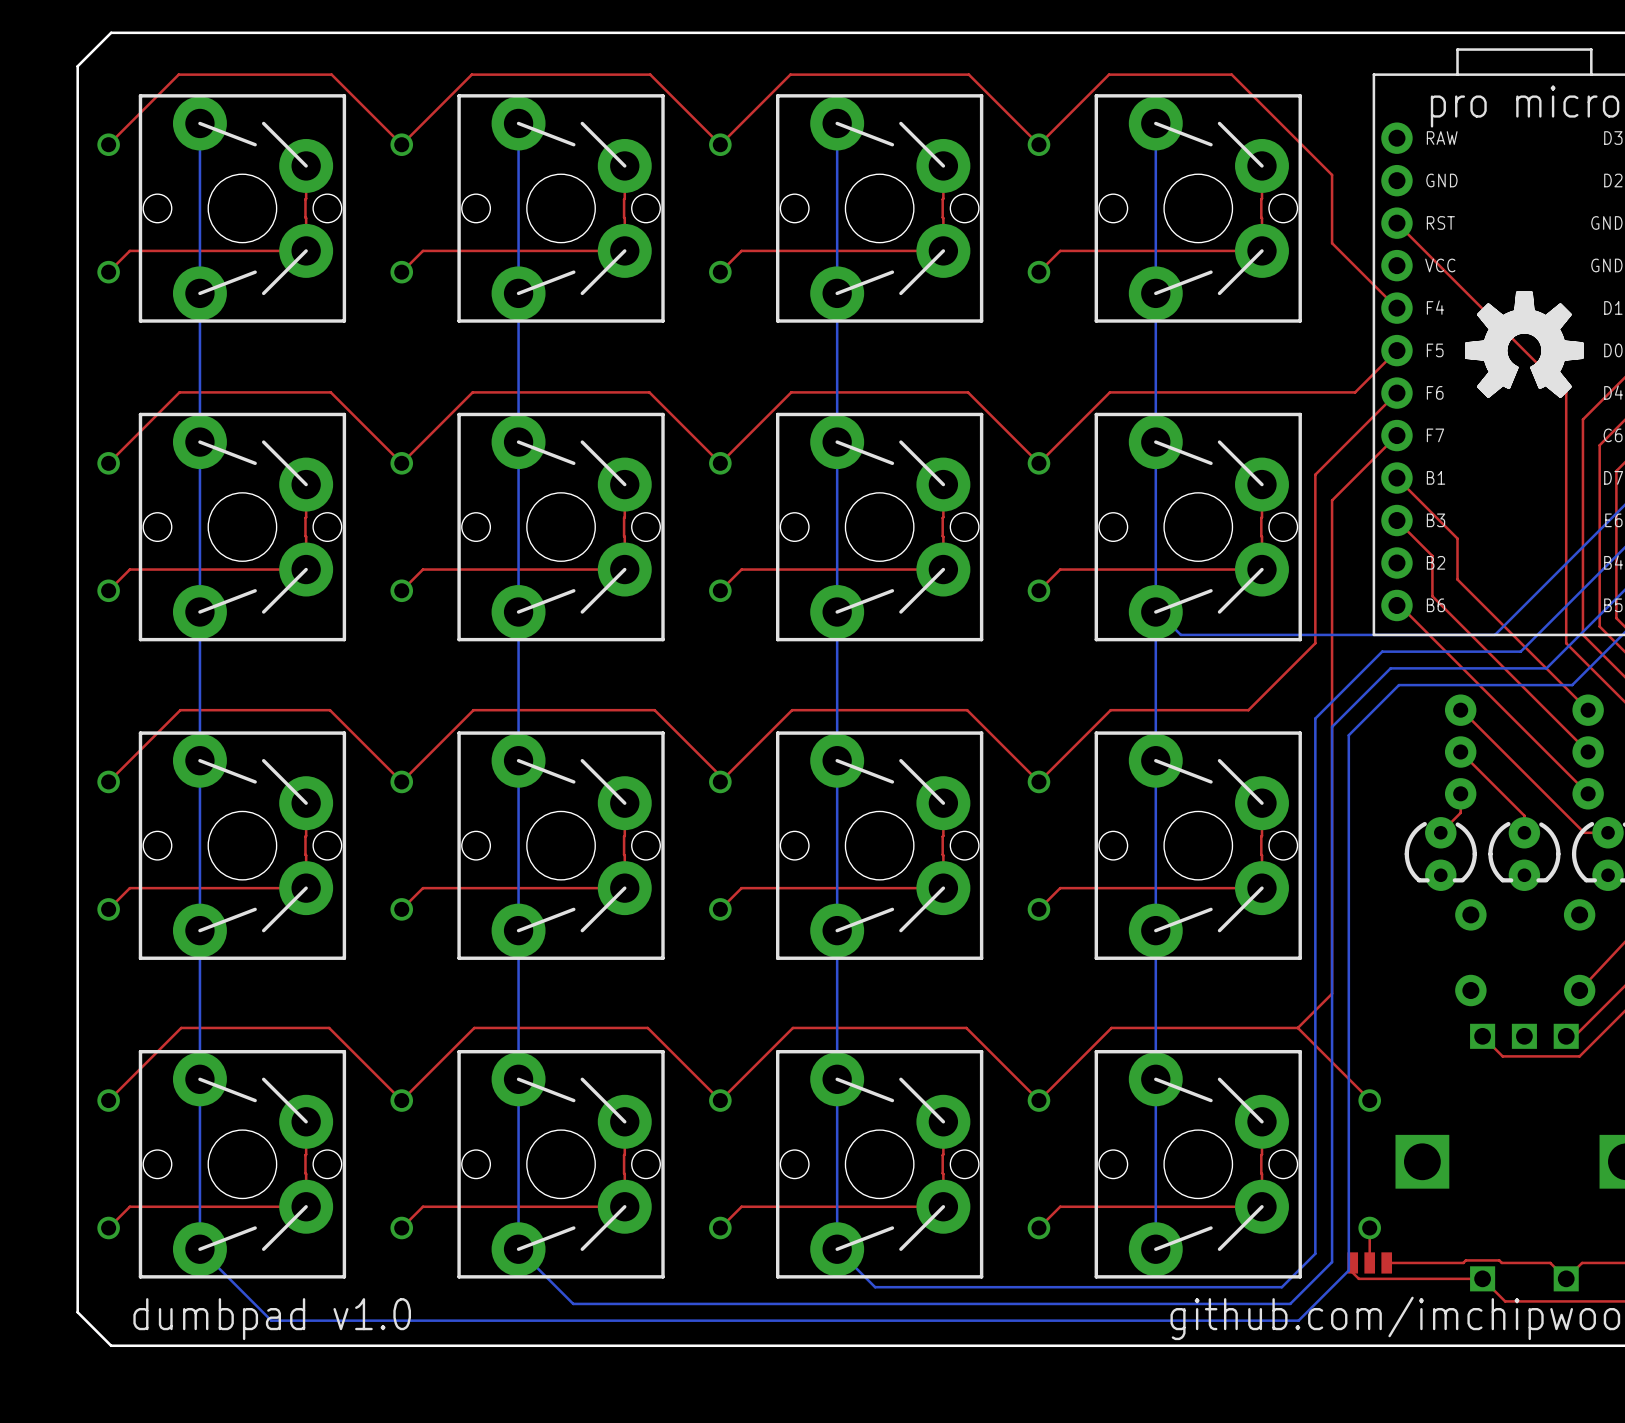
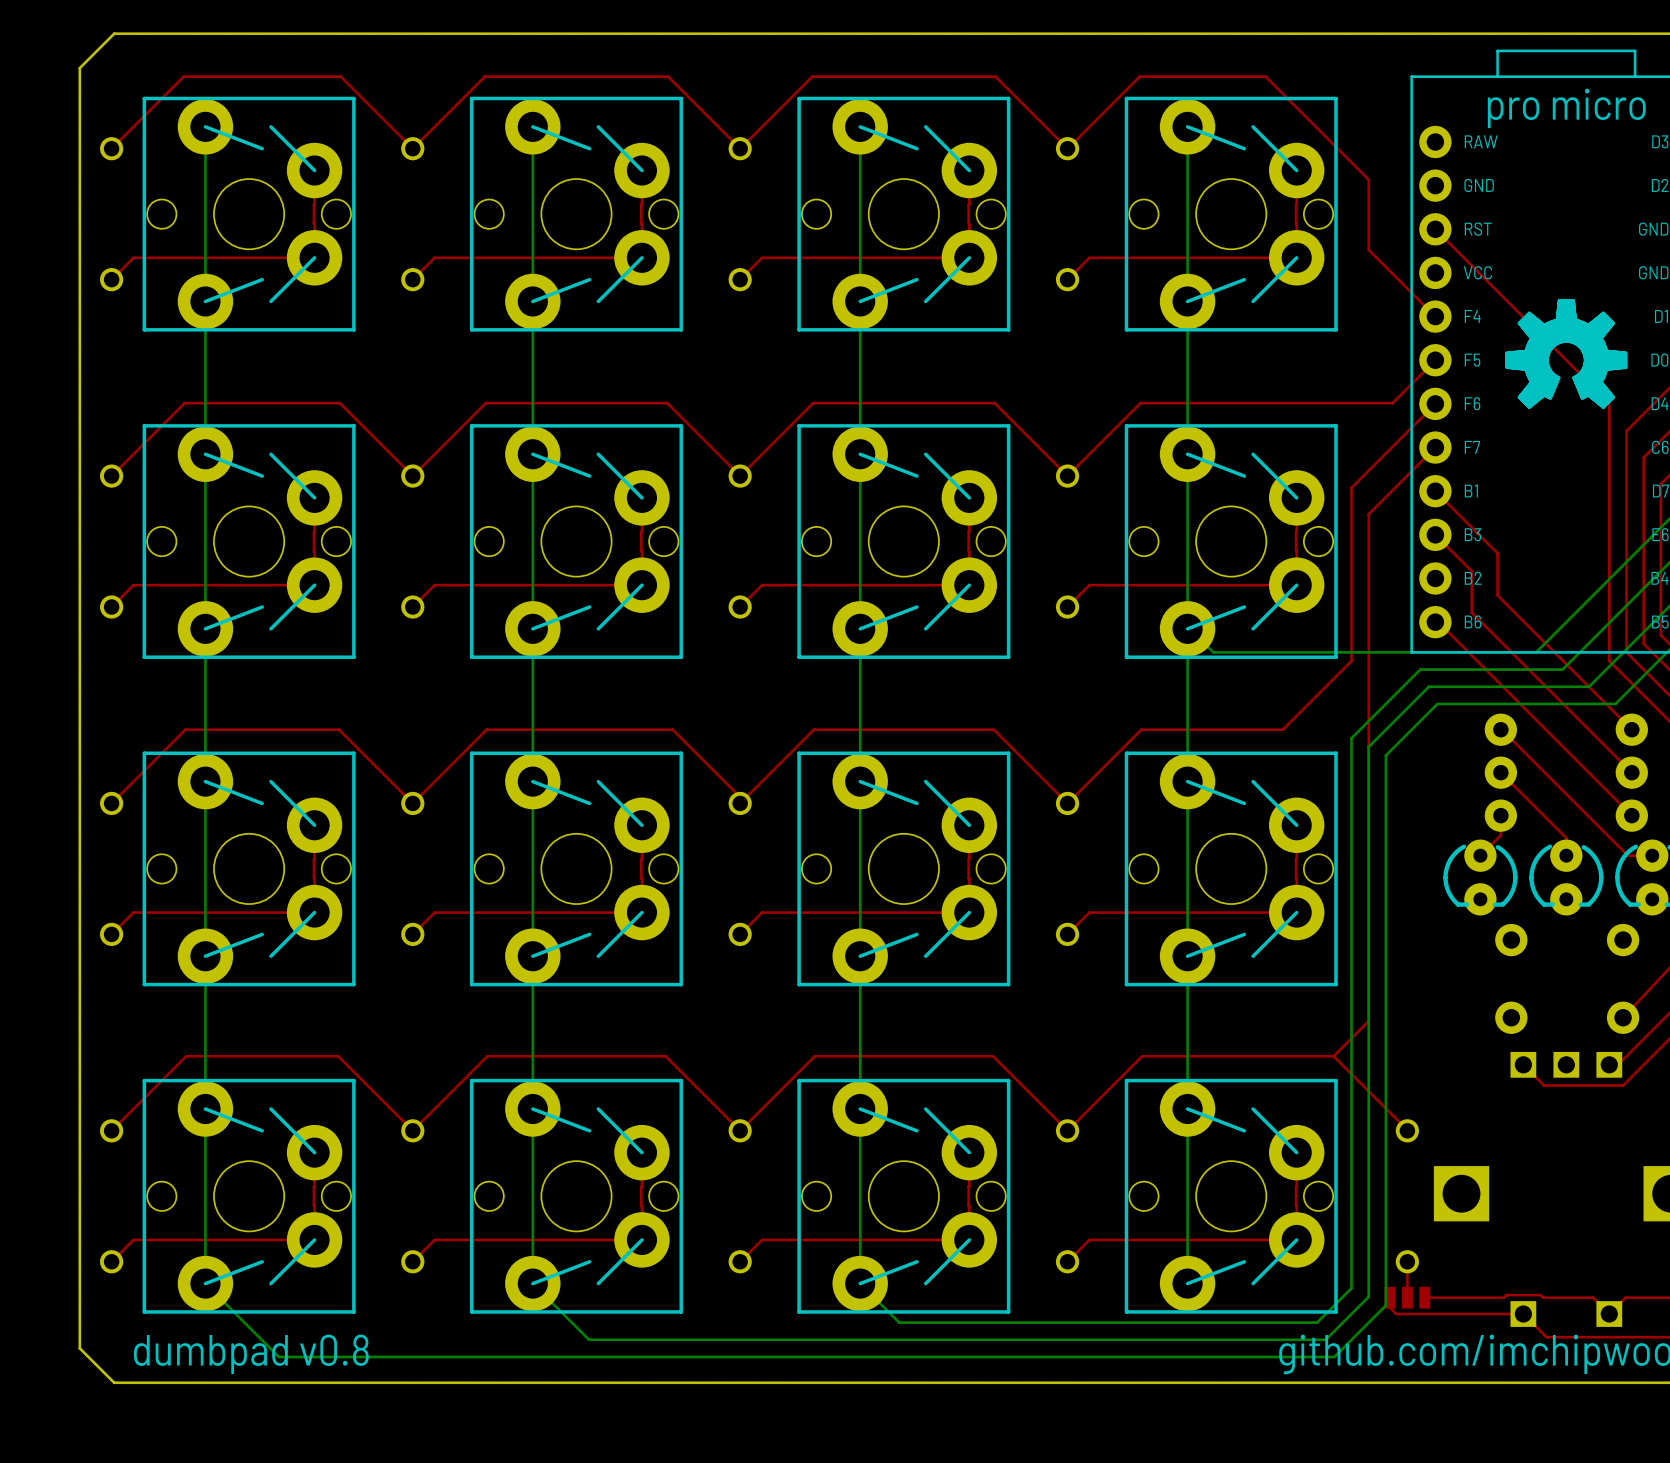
text: dumbpad v1.0 (272, 1319) -> dumbpad v0.8 (251, 1354)

